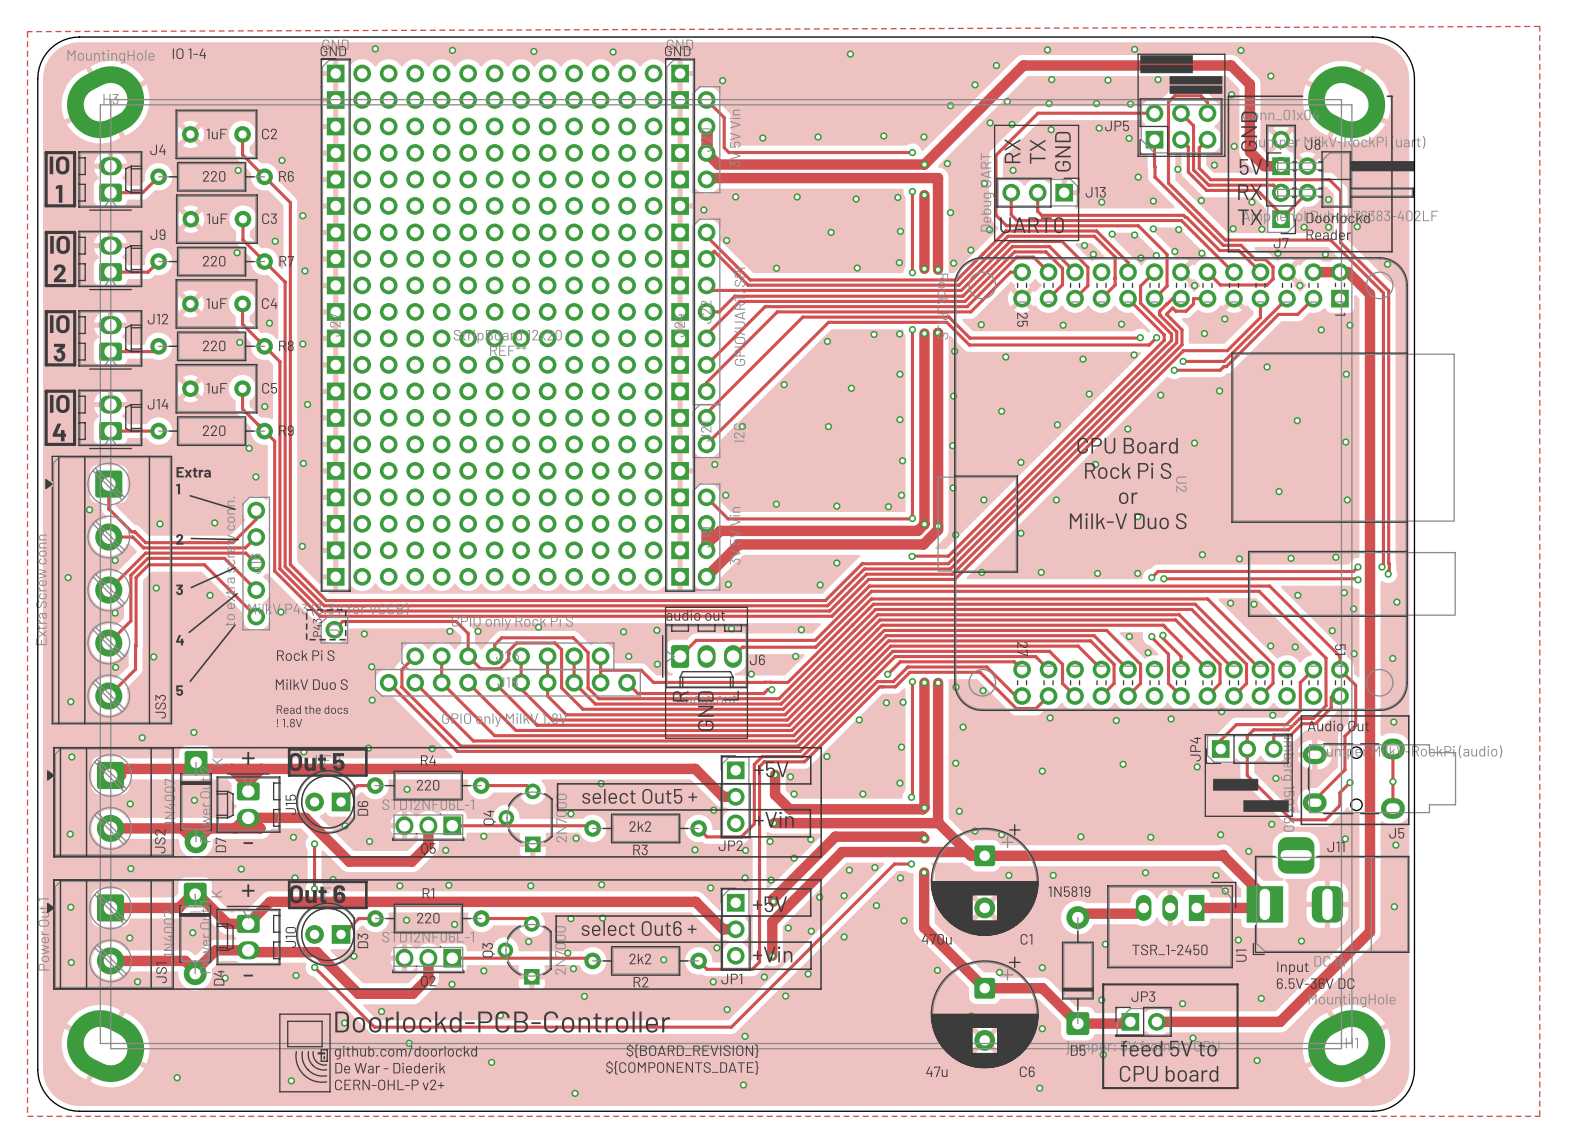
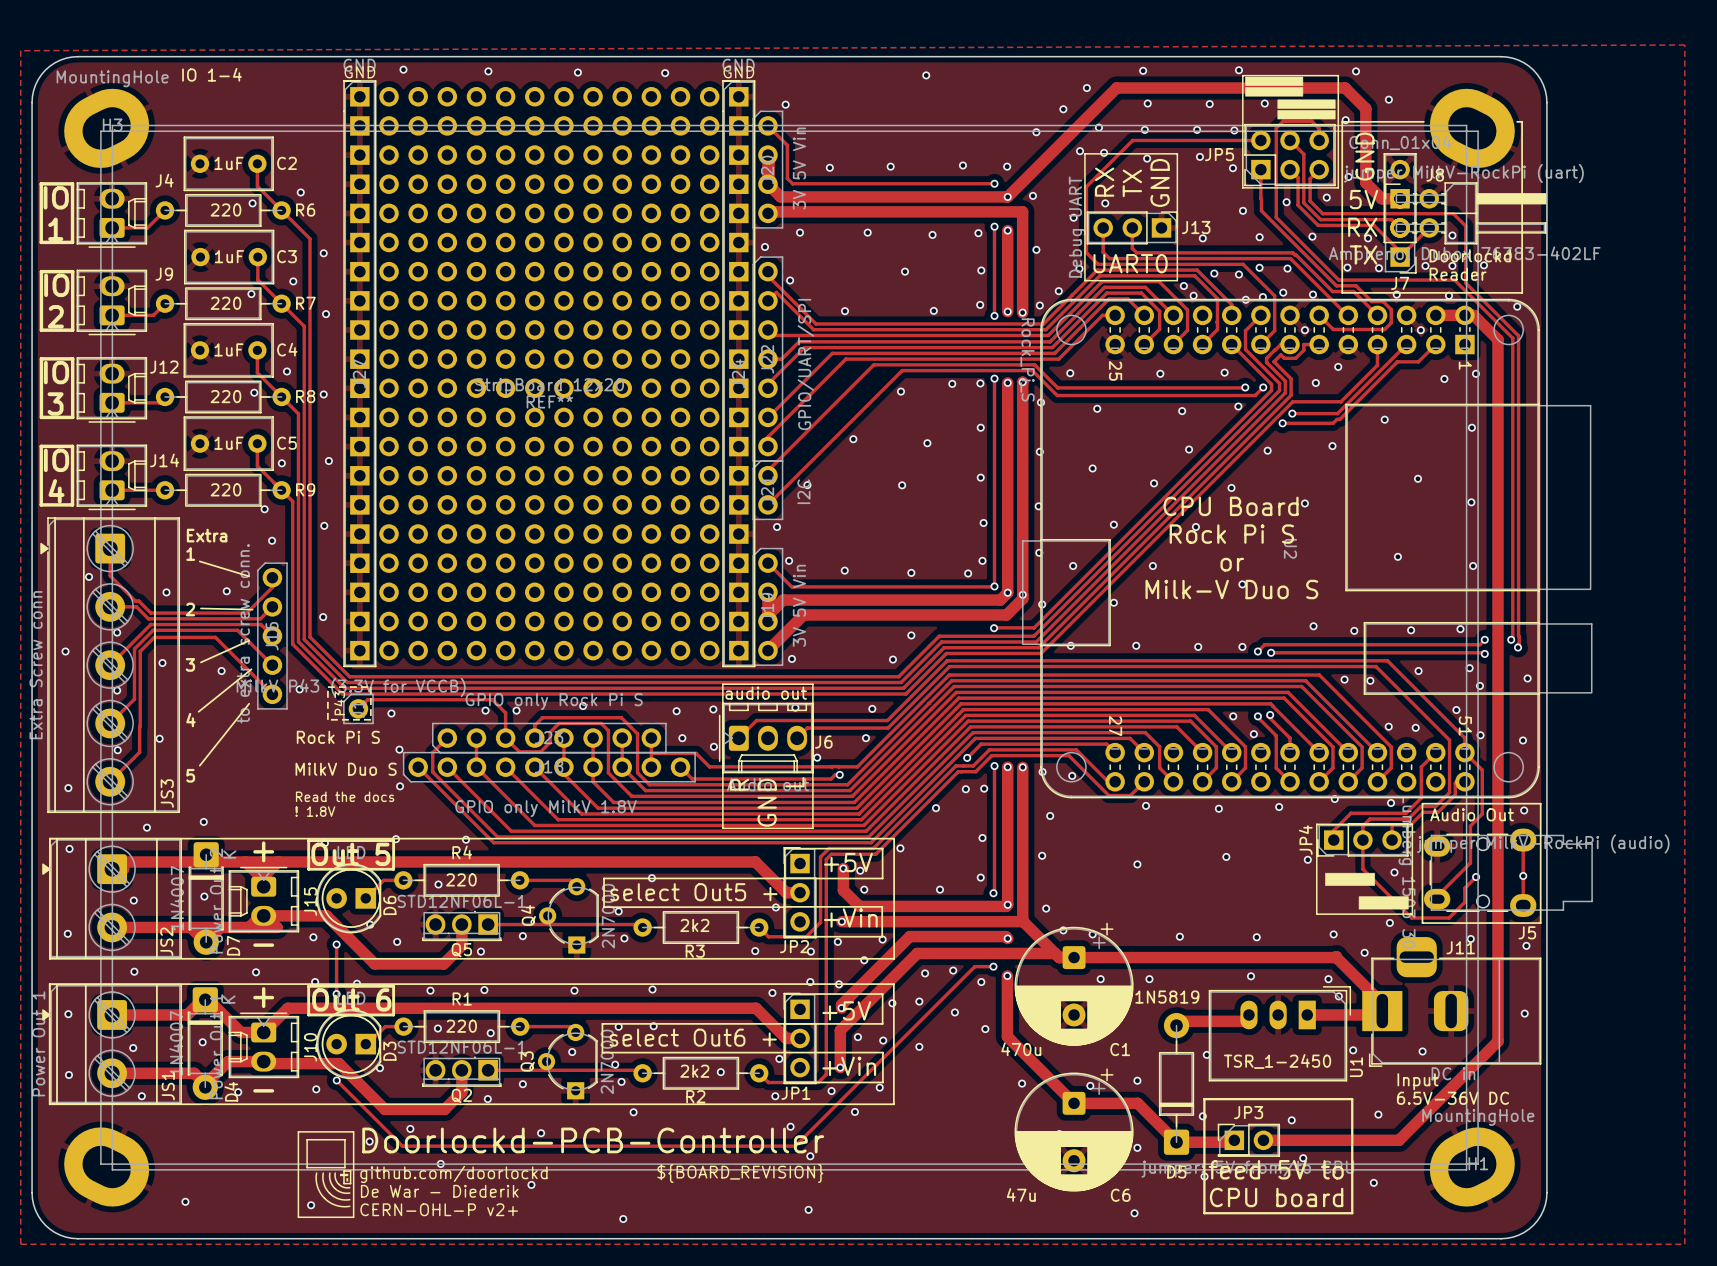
text: ${COMPONENTS_DATE} (682, 1067) -> none

